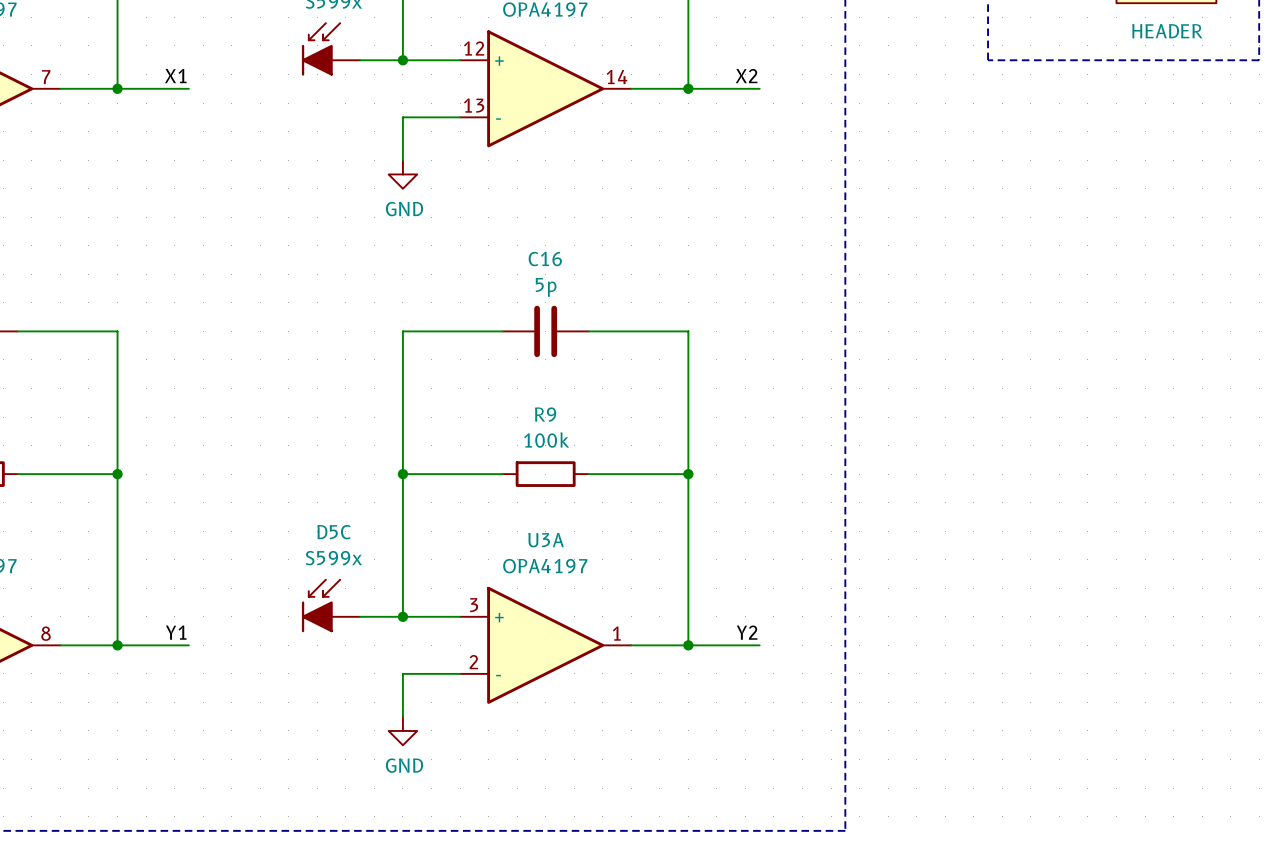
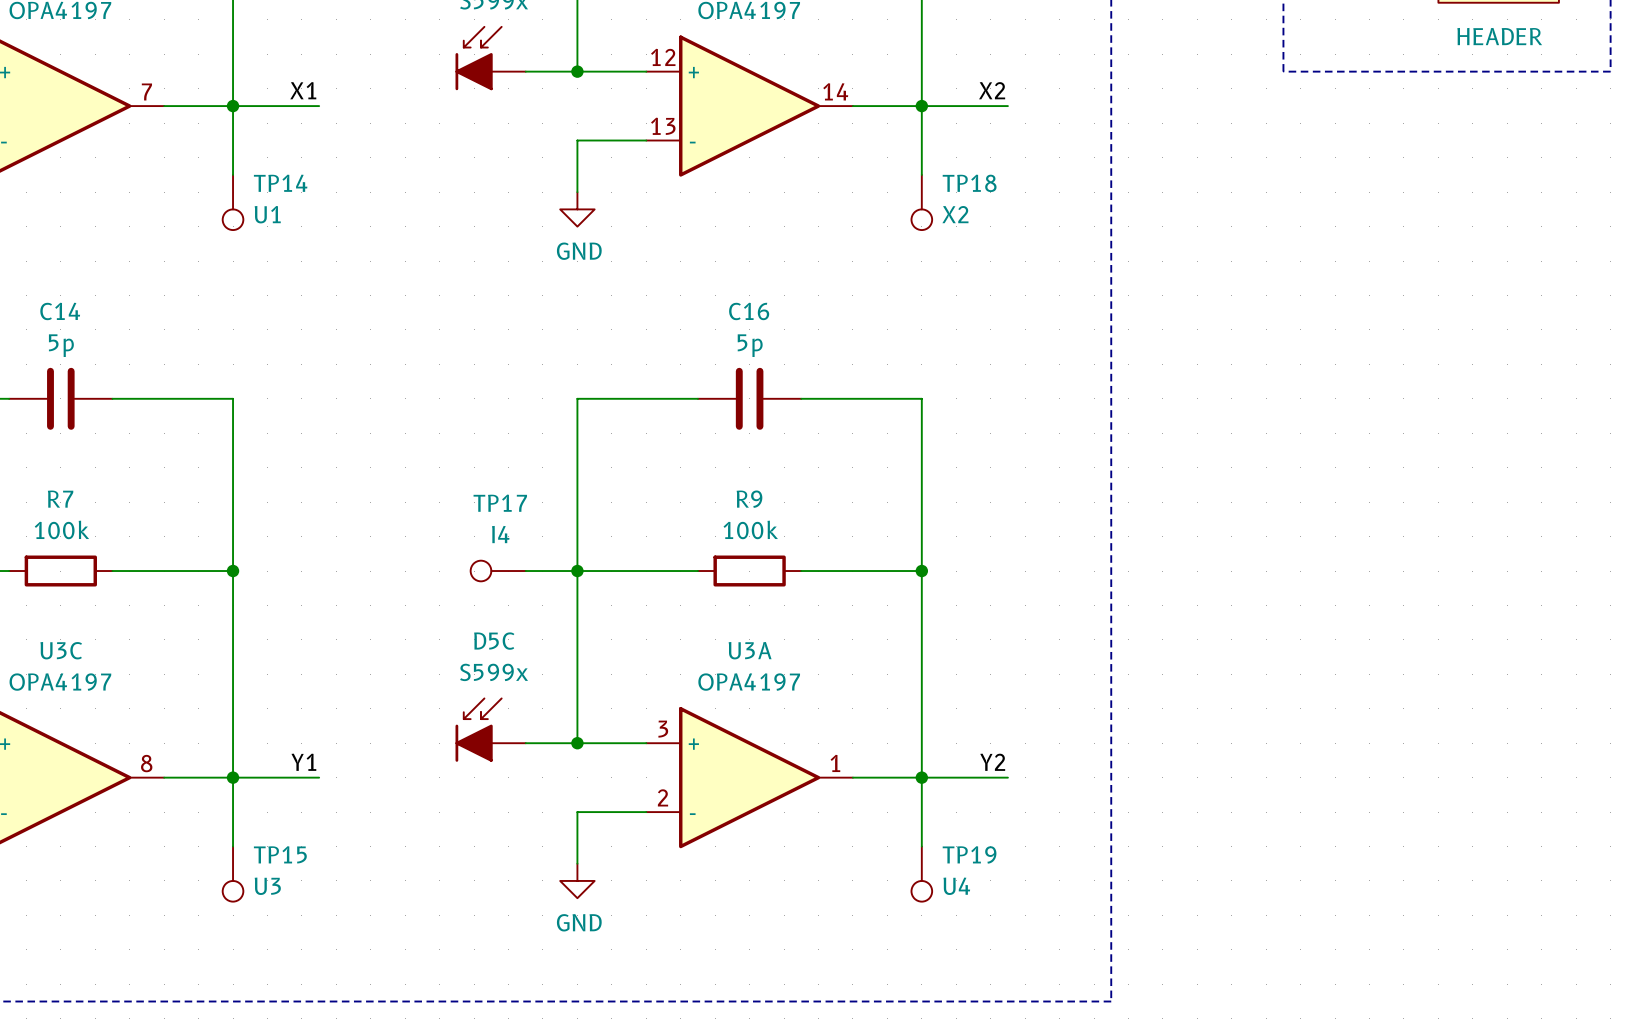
wire: none -> (233, 106) (233, 174)
wire: none -> (921, 106) (921, 174)
TP14: none -> U1 (233, 202)
TP18: none -> X2 (921, 202)
TP17: none -> I4 (498, 571)
wire: none -> (525, 571) (577, 571)
wire: none -> (233, 777) (233, 846)
wire: none -> (921, 777) (921, 846)
TP15: none -> U3 (233, 874)
TP19: none -> U4 (921, 874)

